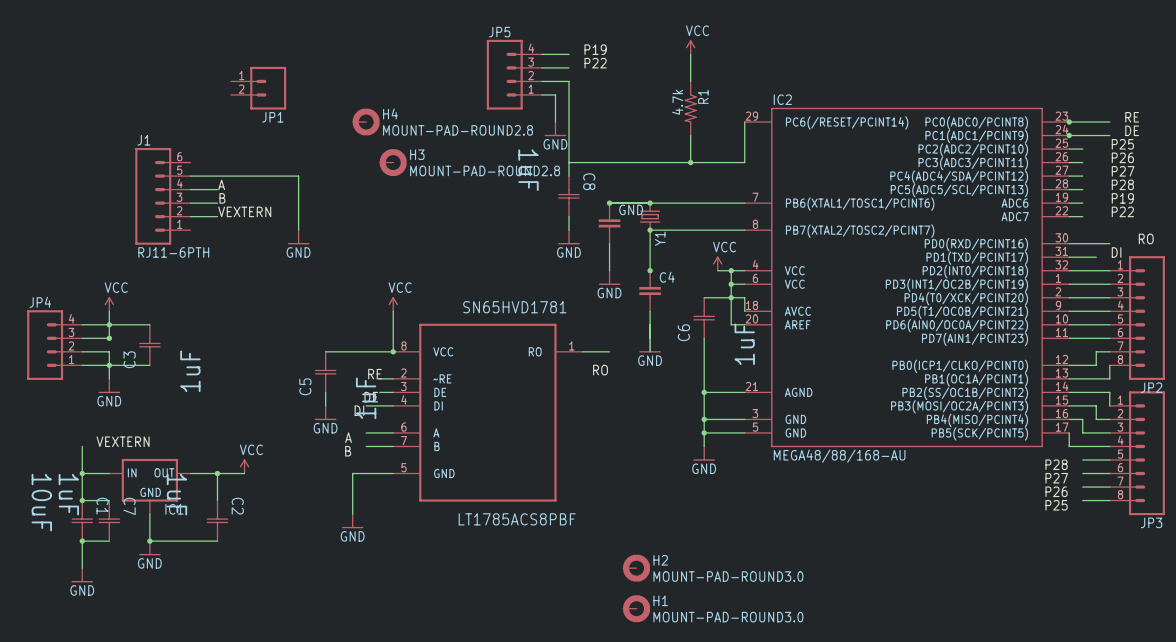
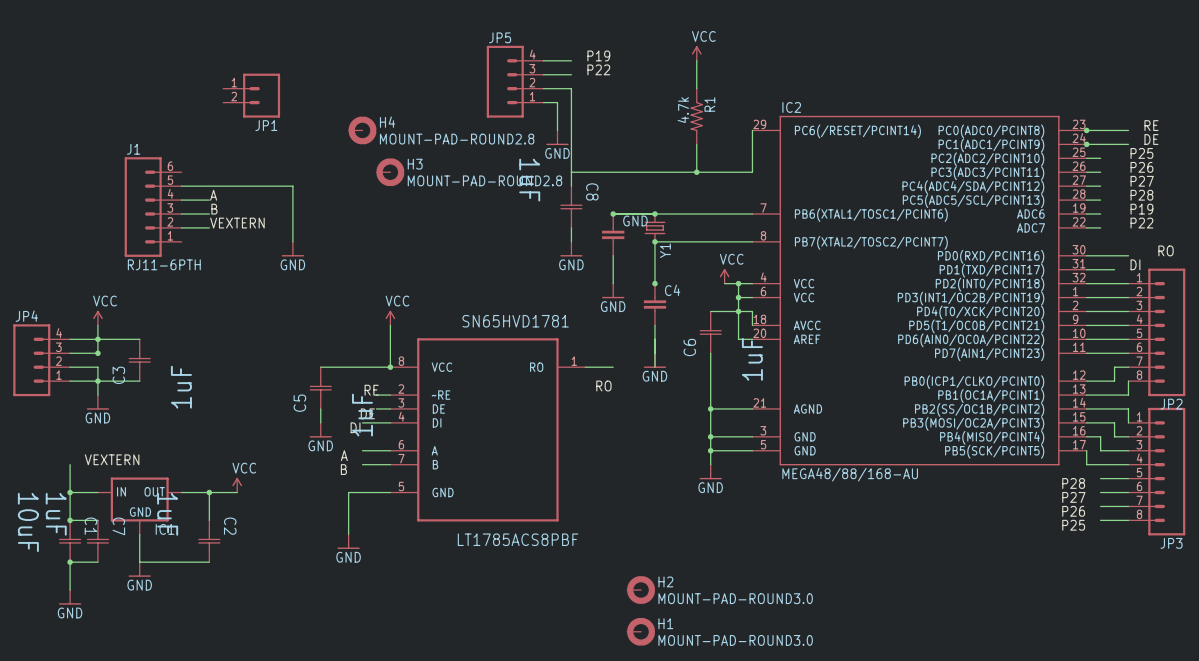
junction: (149, 541) -> none

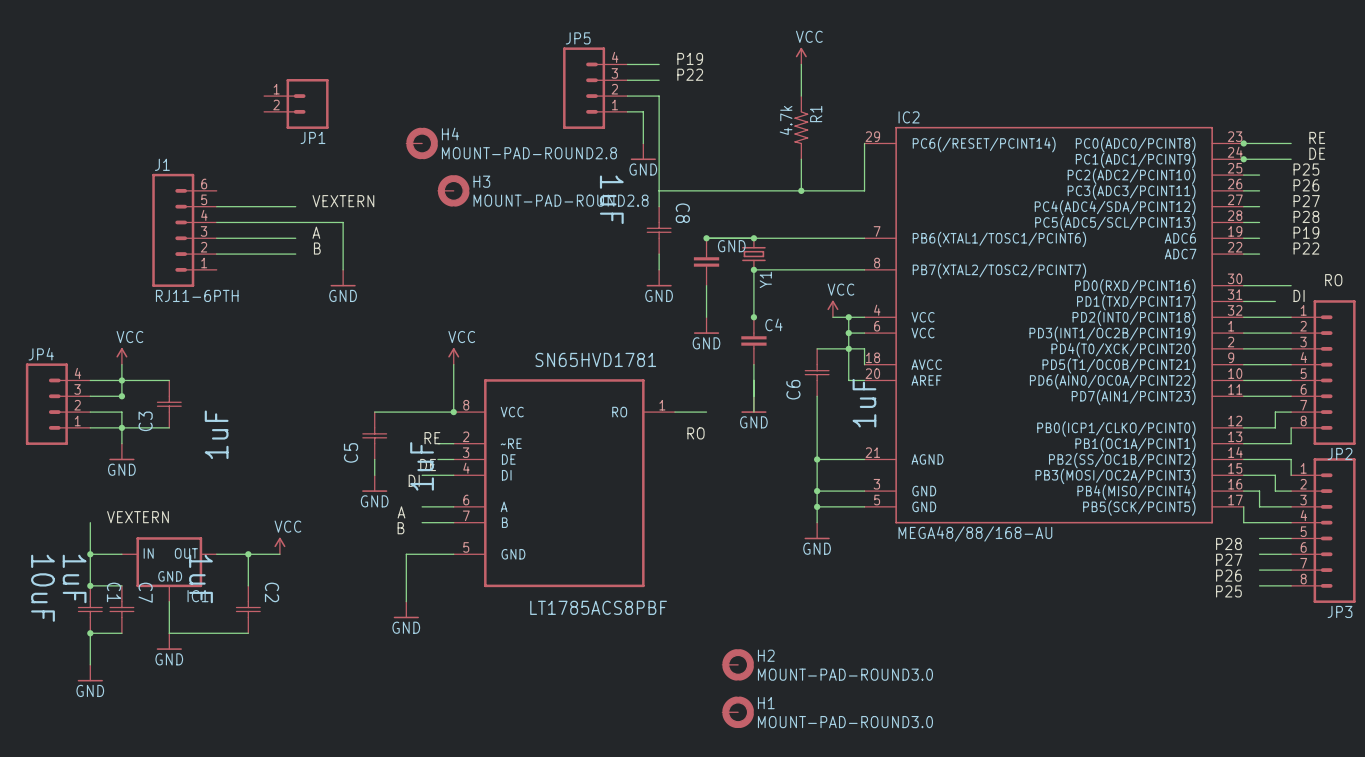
wire: (251, 186) (292, 186) (292, 200) -> (248, 222) (343, 222)
label position: A (213, 195) -> A (316, 232)
label position: B (214, 209) -> B (317, 248)
wire: none -> (248, 238) (295, 238)
label position: VEXTERN (237, 223) -> VEXTERN (343, 201)
wire: none -> (248, 254) (295, 254)

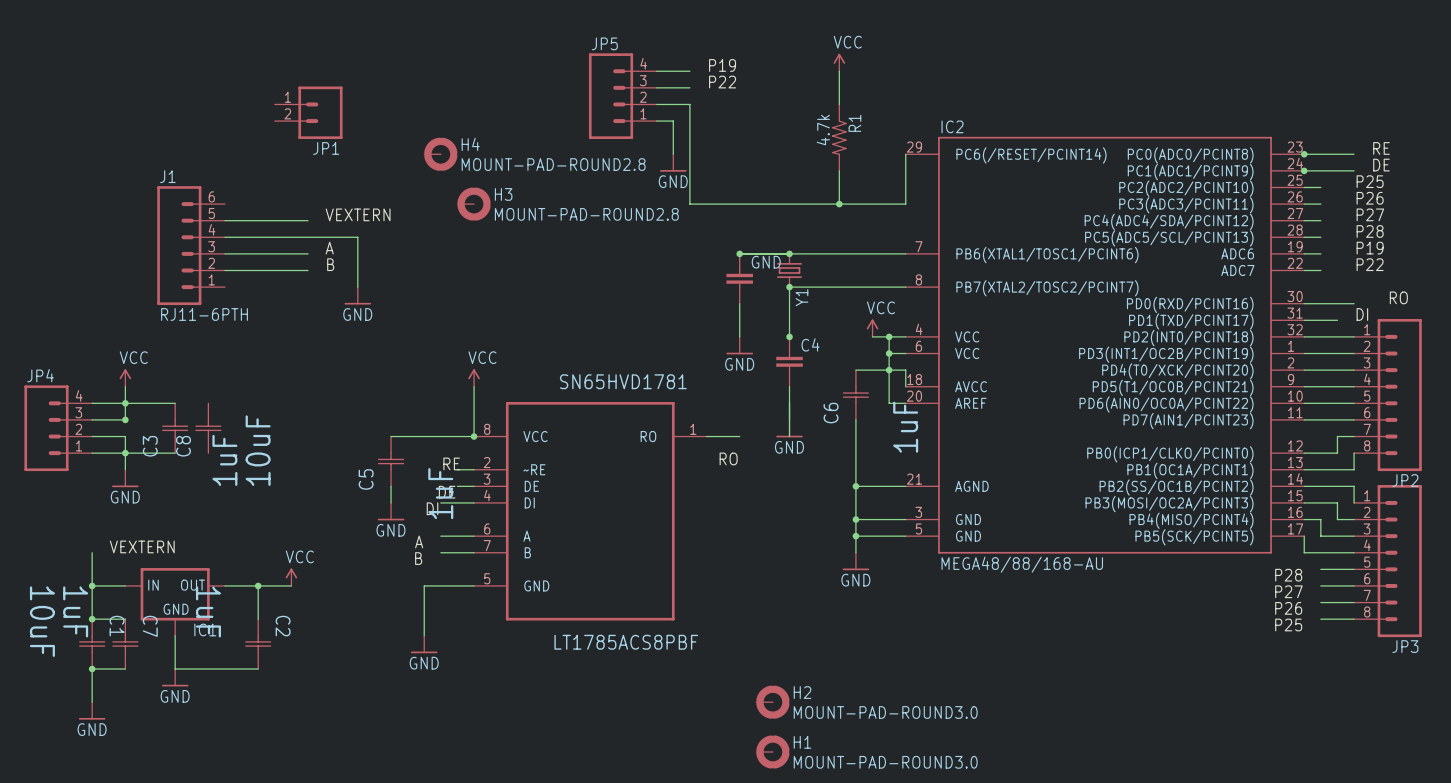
wire: (659, 190) (659, 206) -> none
C8 value: 1uF (611, 199) -> 10uF (258, 450)
C8 name rotation: 0° (682, 213) -> 180° (183, 446)
C8 name position: C8 (682, 213) -> C8 (183, 446)
C8 position: (659, 230) -> (208, 428)
wire: (659, 254) (659, 269) -> none
power symbol: GND (659, 278) -> none

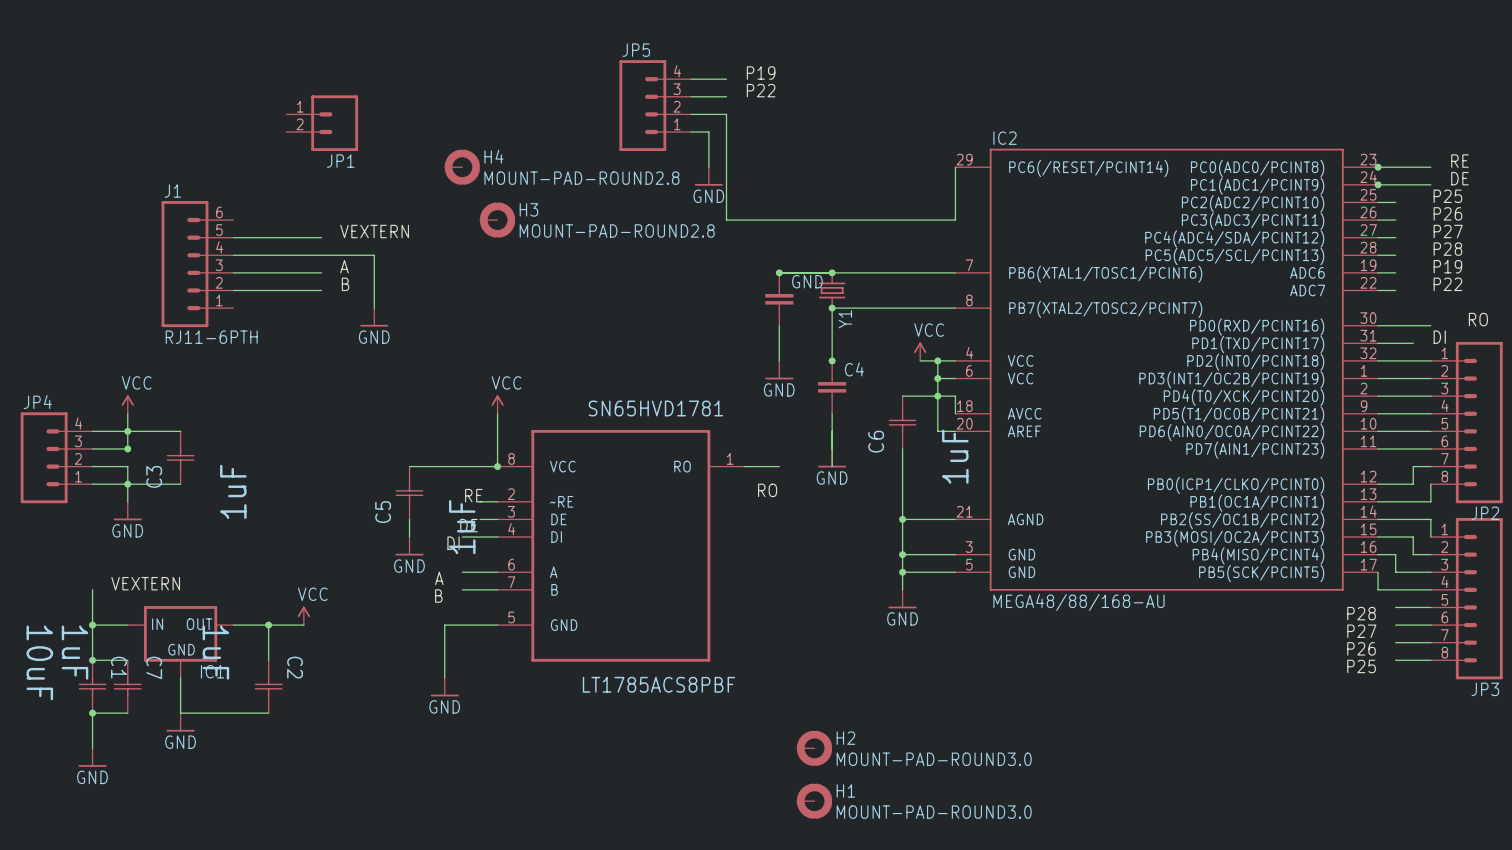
power symbol: VCC (839, 62) -> none
wire: (839, 71) (839, 104) -> none
R1: 4.7k (839, 137) -> none
wire: (839, 170) (839, 204) -> none
junction: (839, 204) -> none
C8: 10uF (208, 428) -> none

